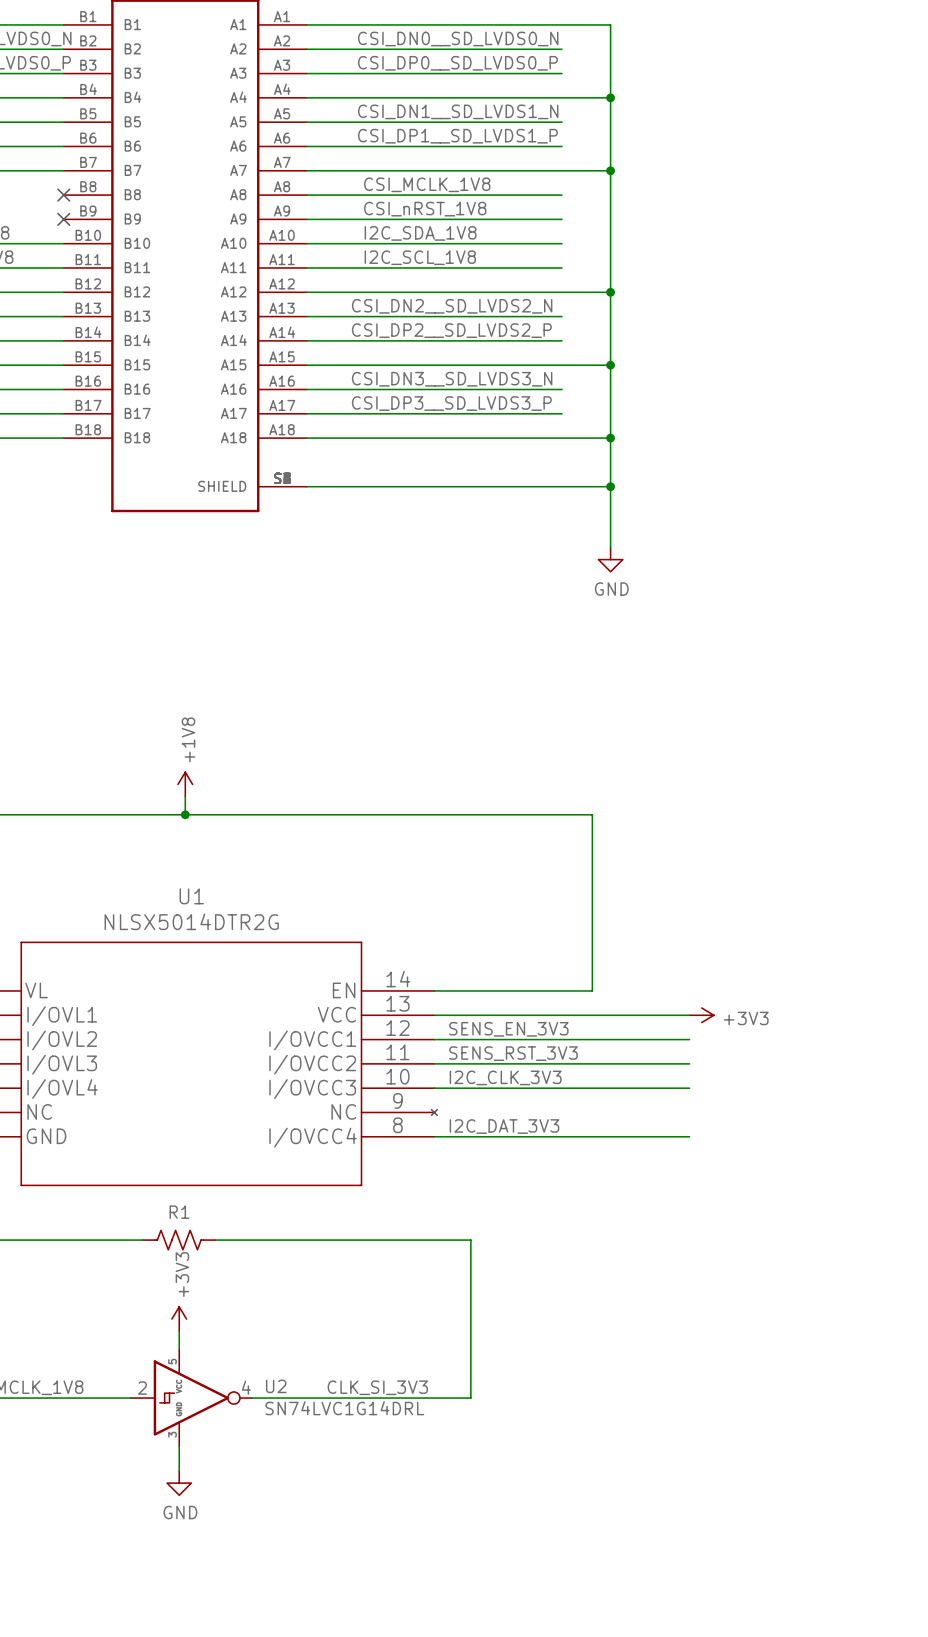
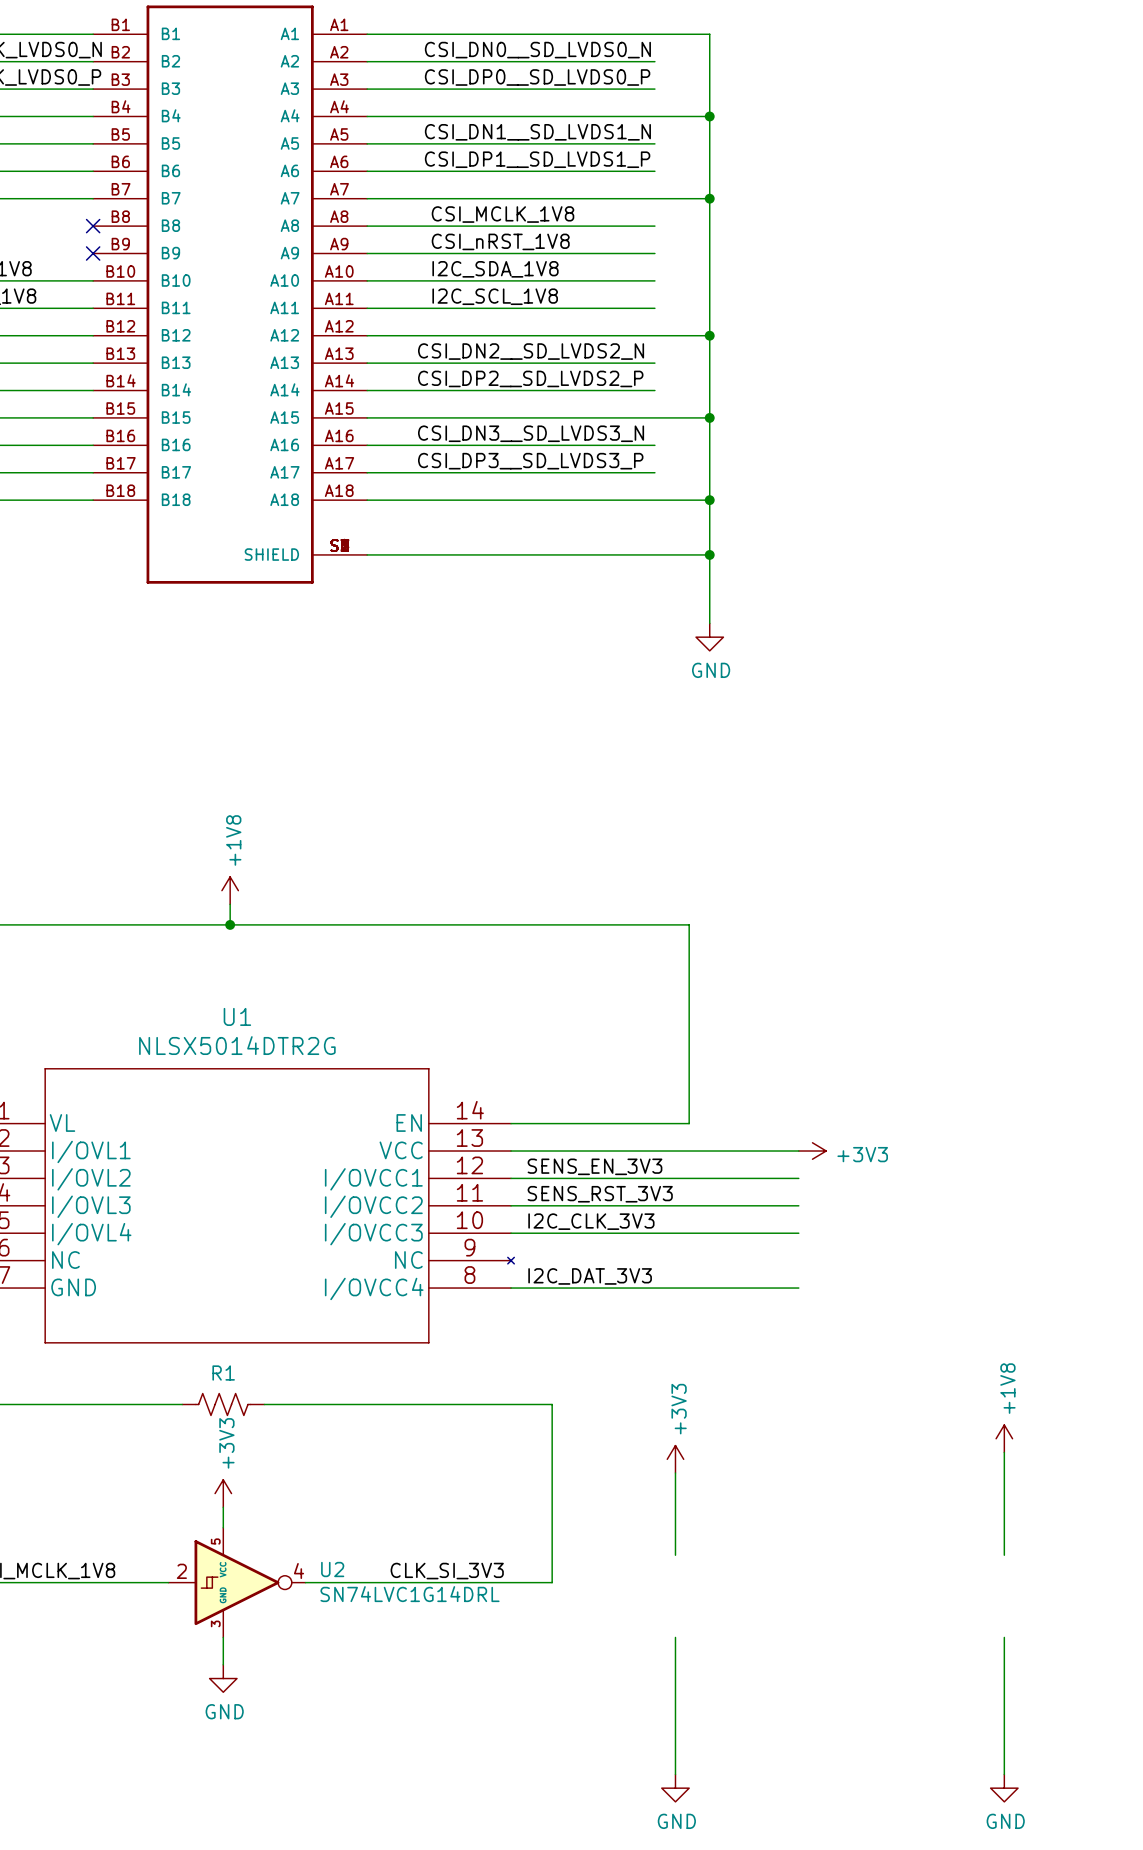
power symbol: none -> +1V8 (1004, 1438)
wire: none -> (1004, 1452) (1004, 1555)
power symbol: none -> +3V3 (675, 1459)
wire: none -> (675, 1473) (675, 1555)
wire: none -> (675, 1637) (675, 1774)
wire: none -> (1004, 1637) (1004, 1774)
power symbol: none -> GND (675, 1788)
power symbol: none -> GND (1004, 1788)

